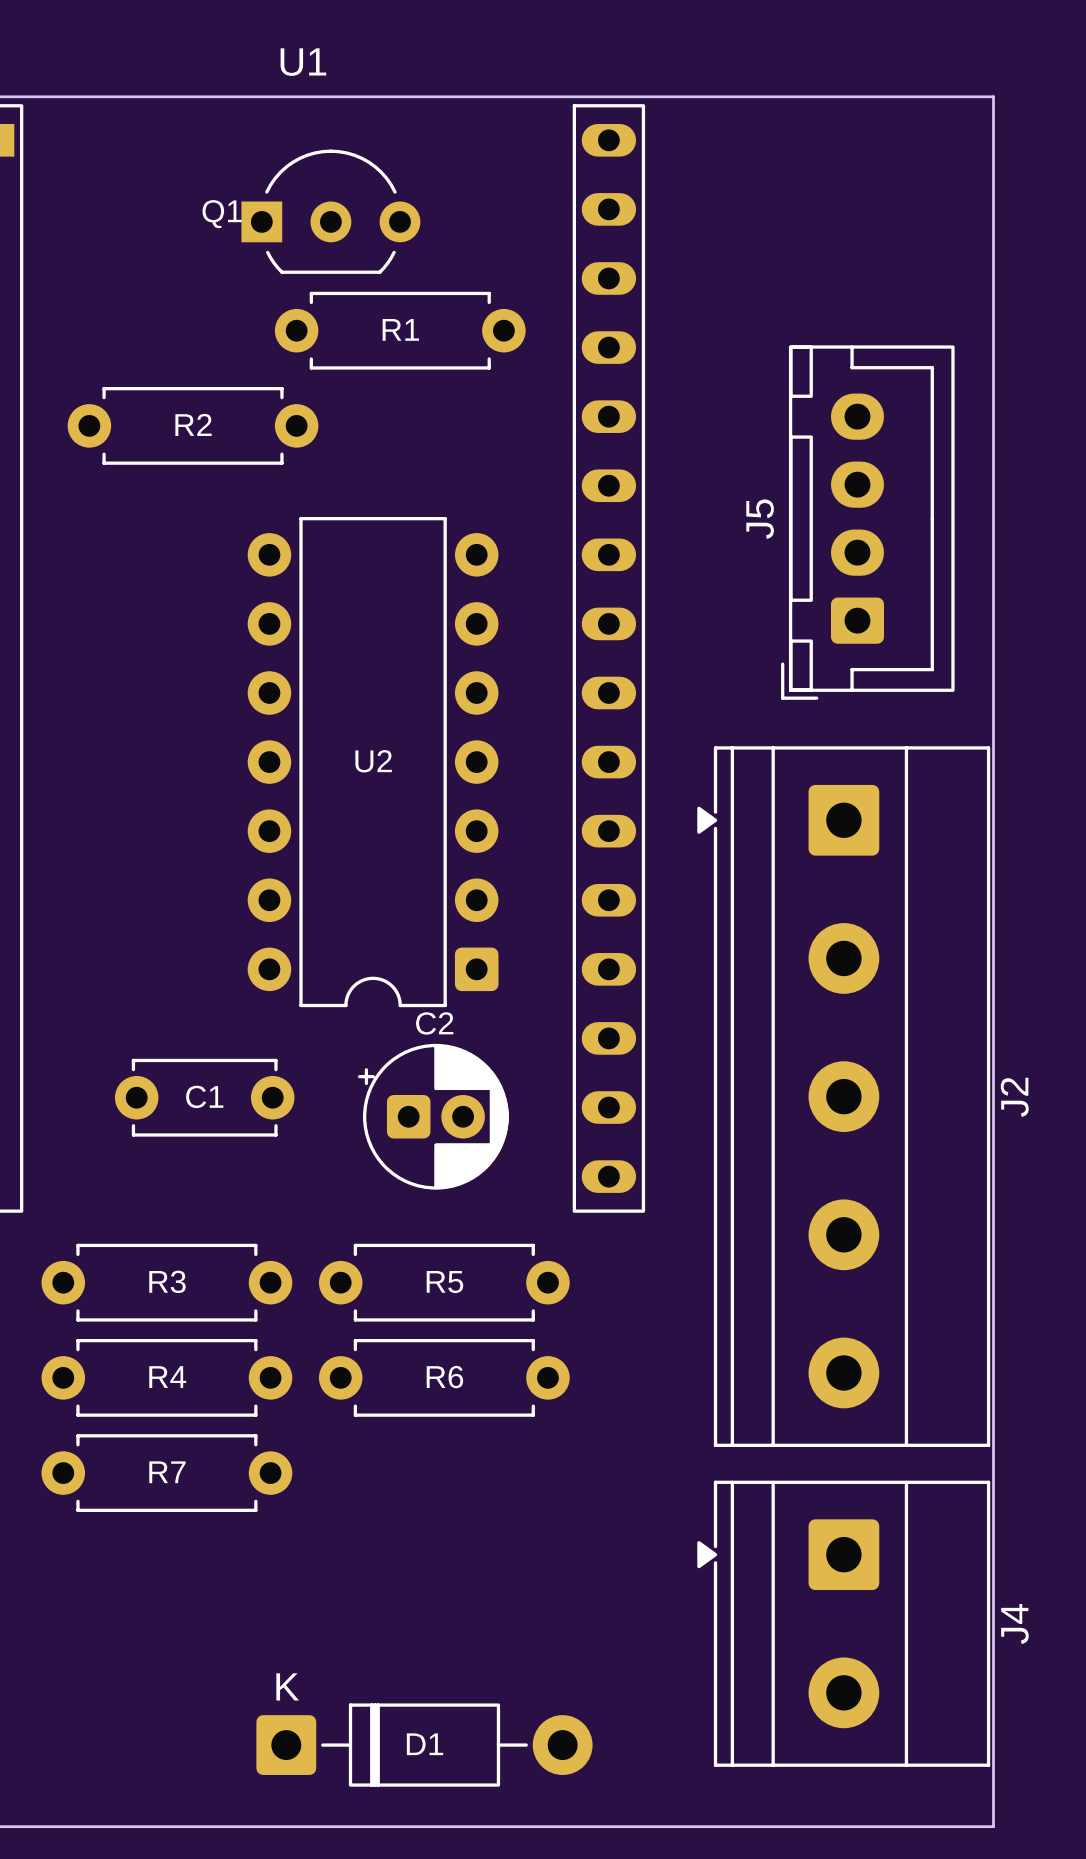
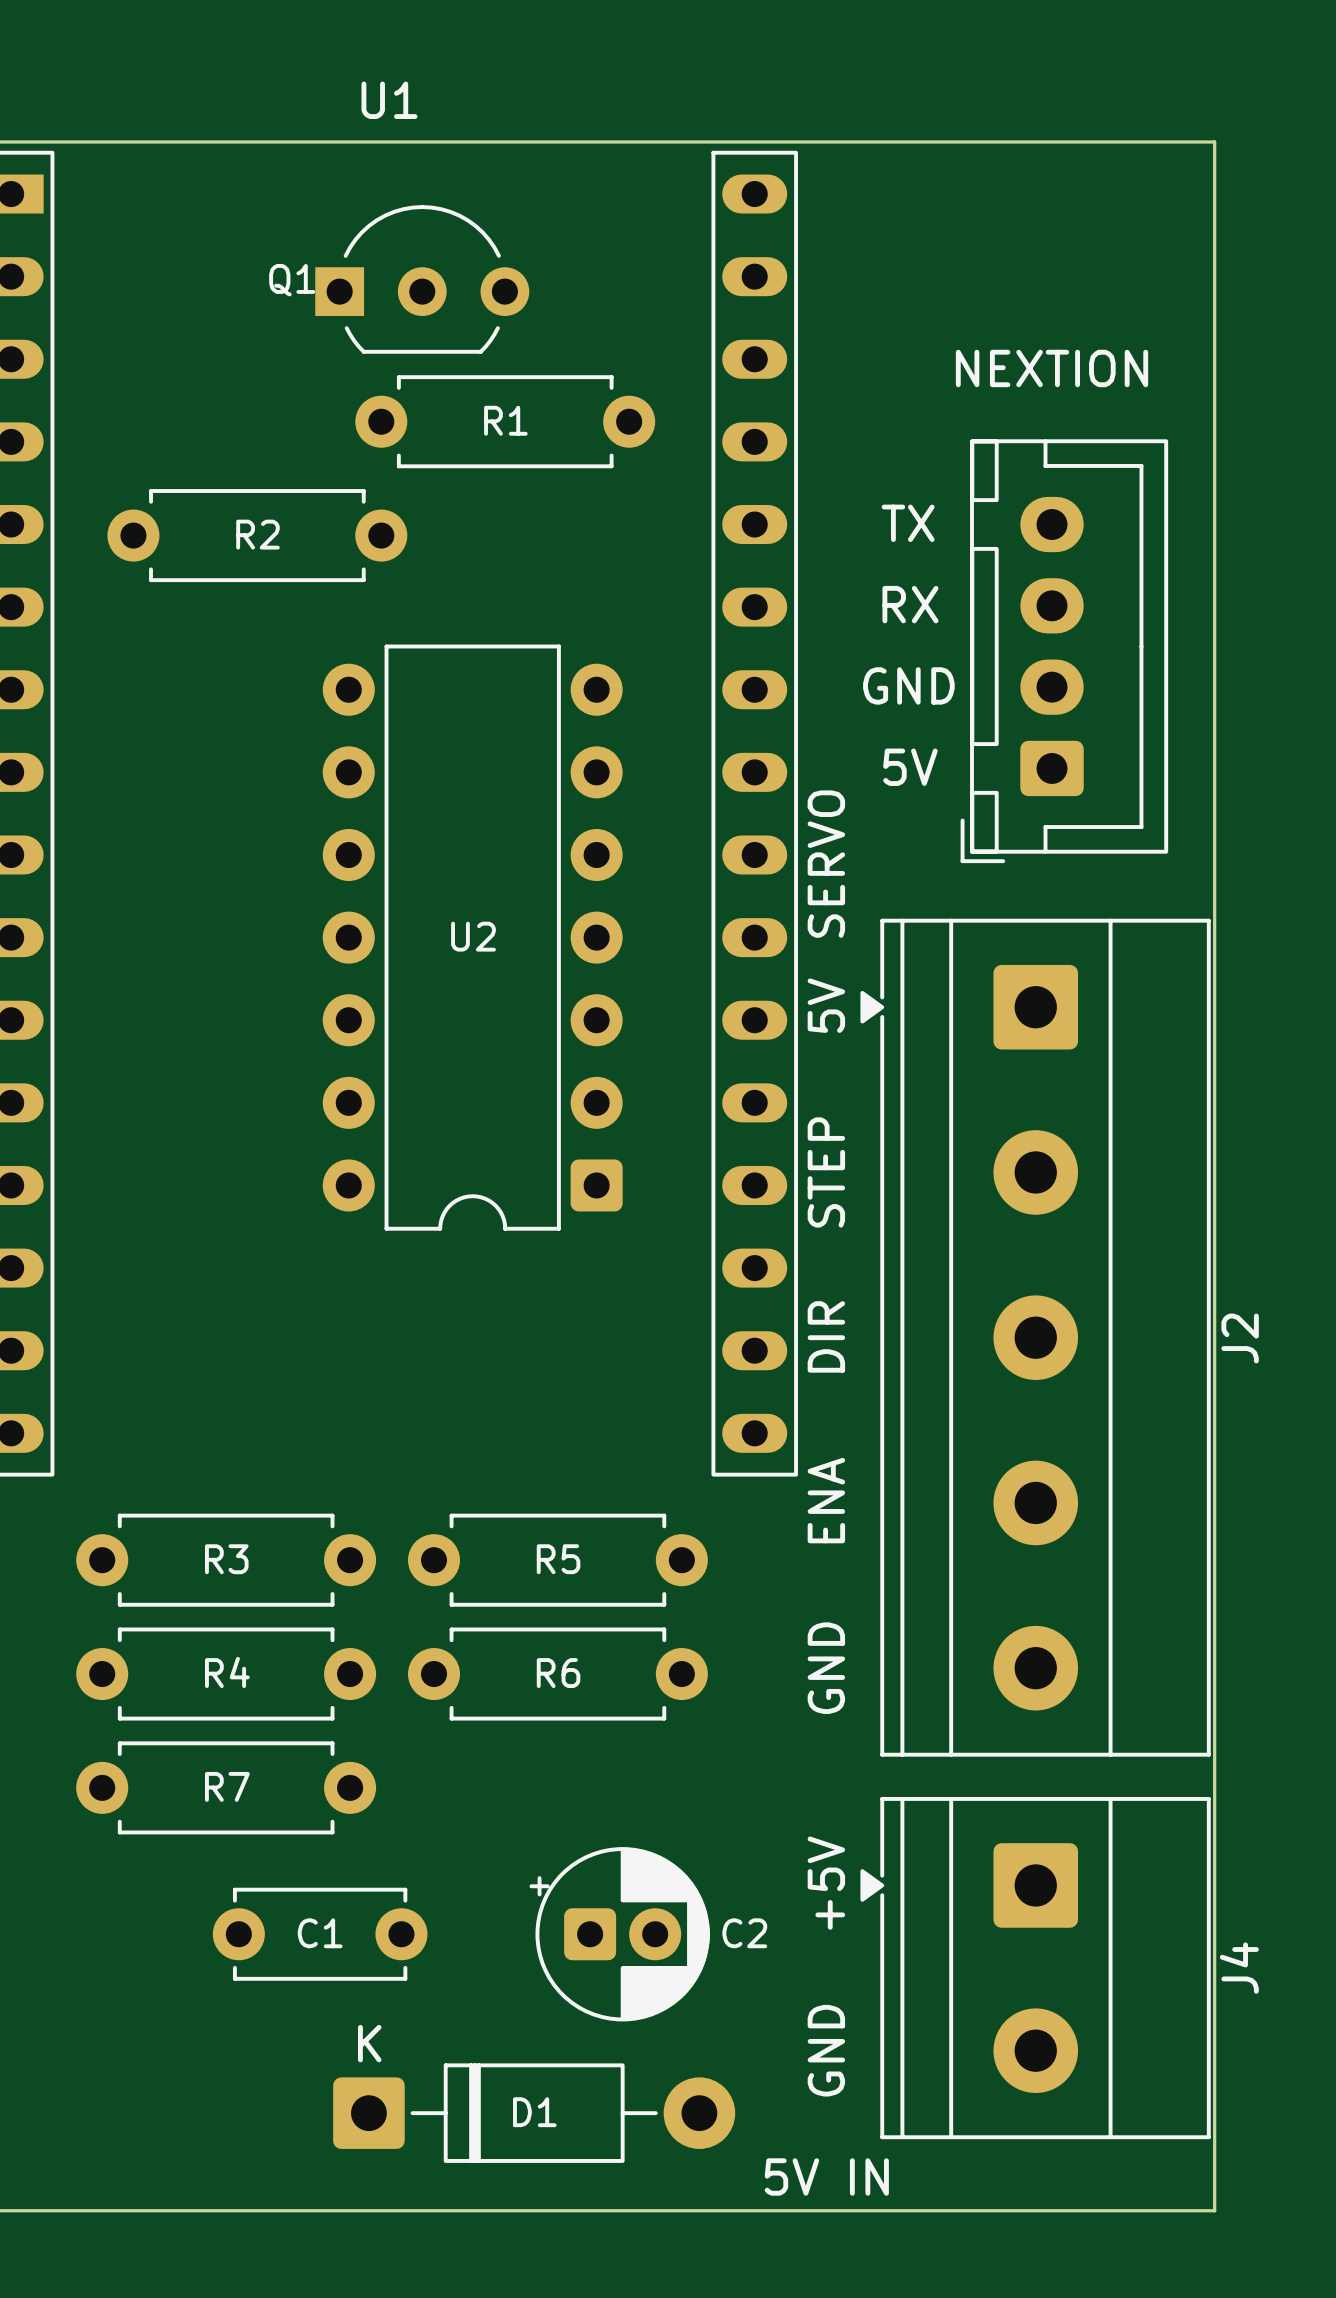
text: none -> NEXTION (1052, 368)
text: none -> TX (908, 523)
text: none -> RX (910, 604)
J5 name: J5 (760, 519) -> none
text: none -> GND (908, 685)
text: none -> 5V (910, 767)
text: none -> SERVO (826, 864)
text: none -> 5V (826, 1005)
text: none -> STEP (826, 1172)
C2 name position: C2 (434, 1023) -> C2 (744, 1933)
text: none -> DIR (826, 1336)
C1 position: (204, 1097) -> (320, 1934)
C2 position: (433, 1116) -> (619, 1934)
text: none -> ENA (826, 1500)
text: none -> GND (826, 1668)
text: none -> +5V (826, 1883)
text: none -> GND (826, 2050)
text: none -> 5V IN (826, 2176)

